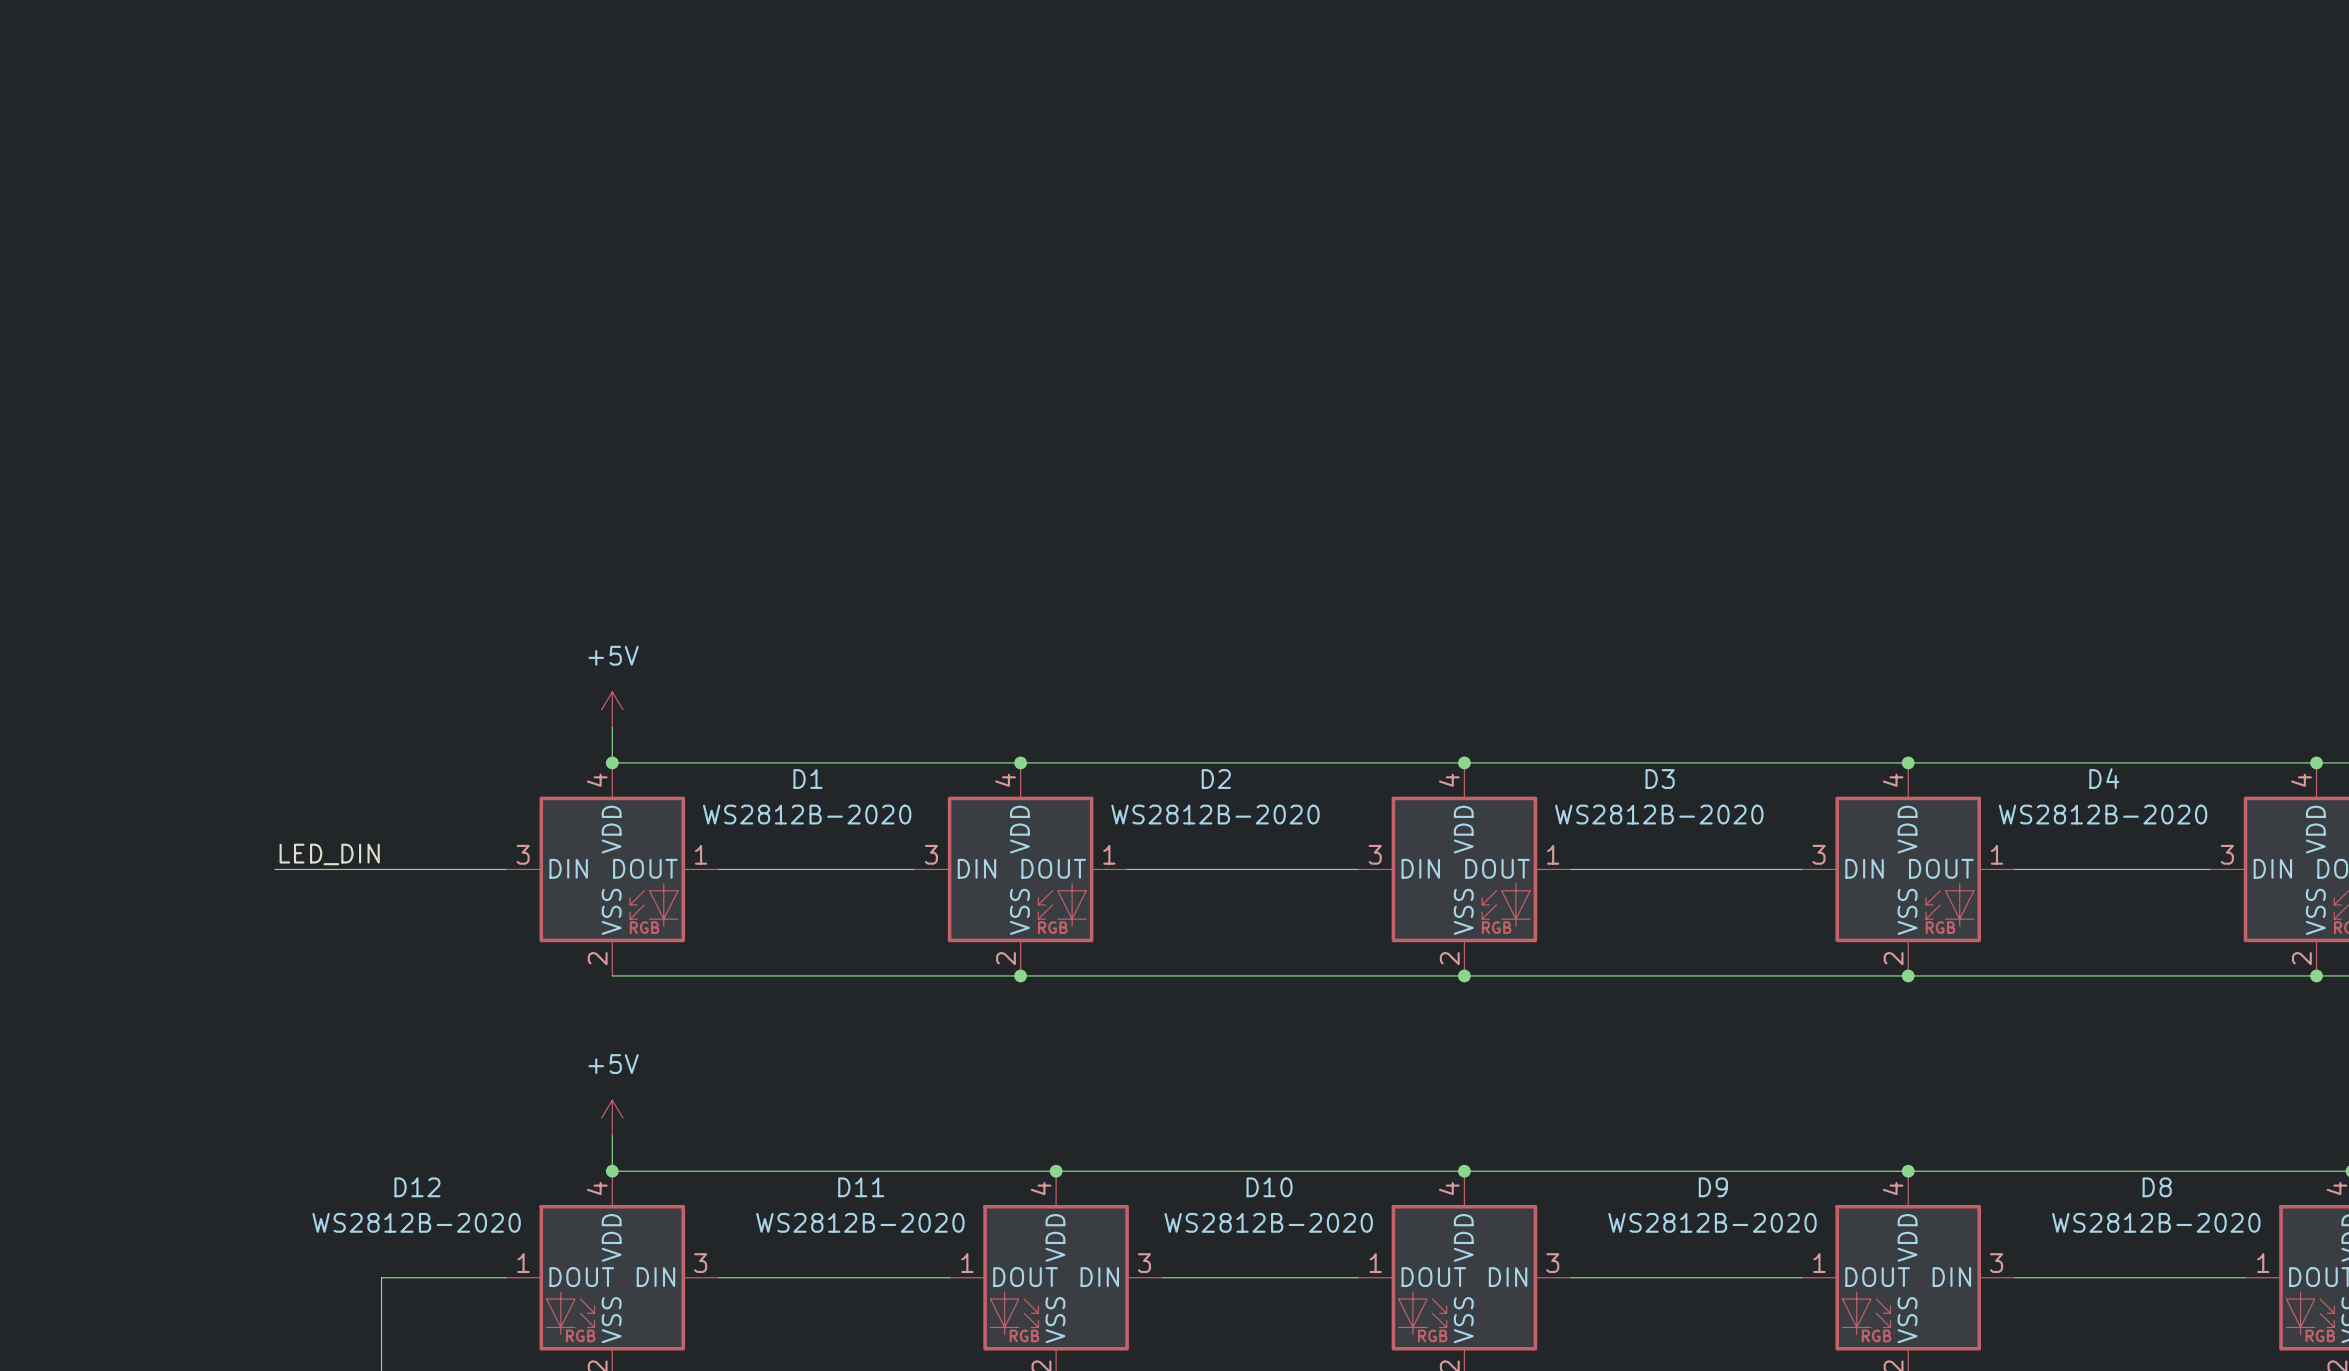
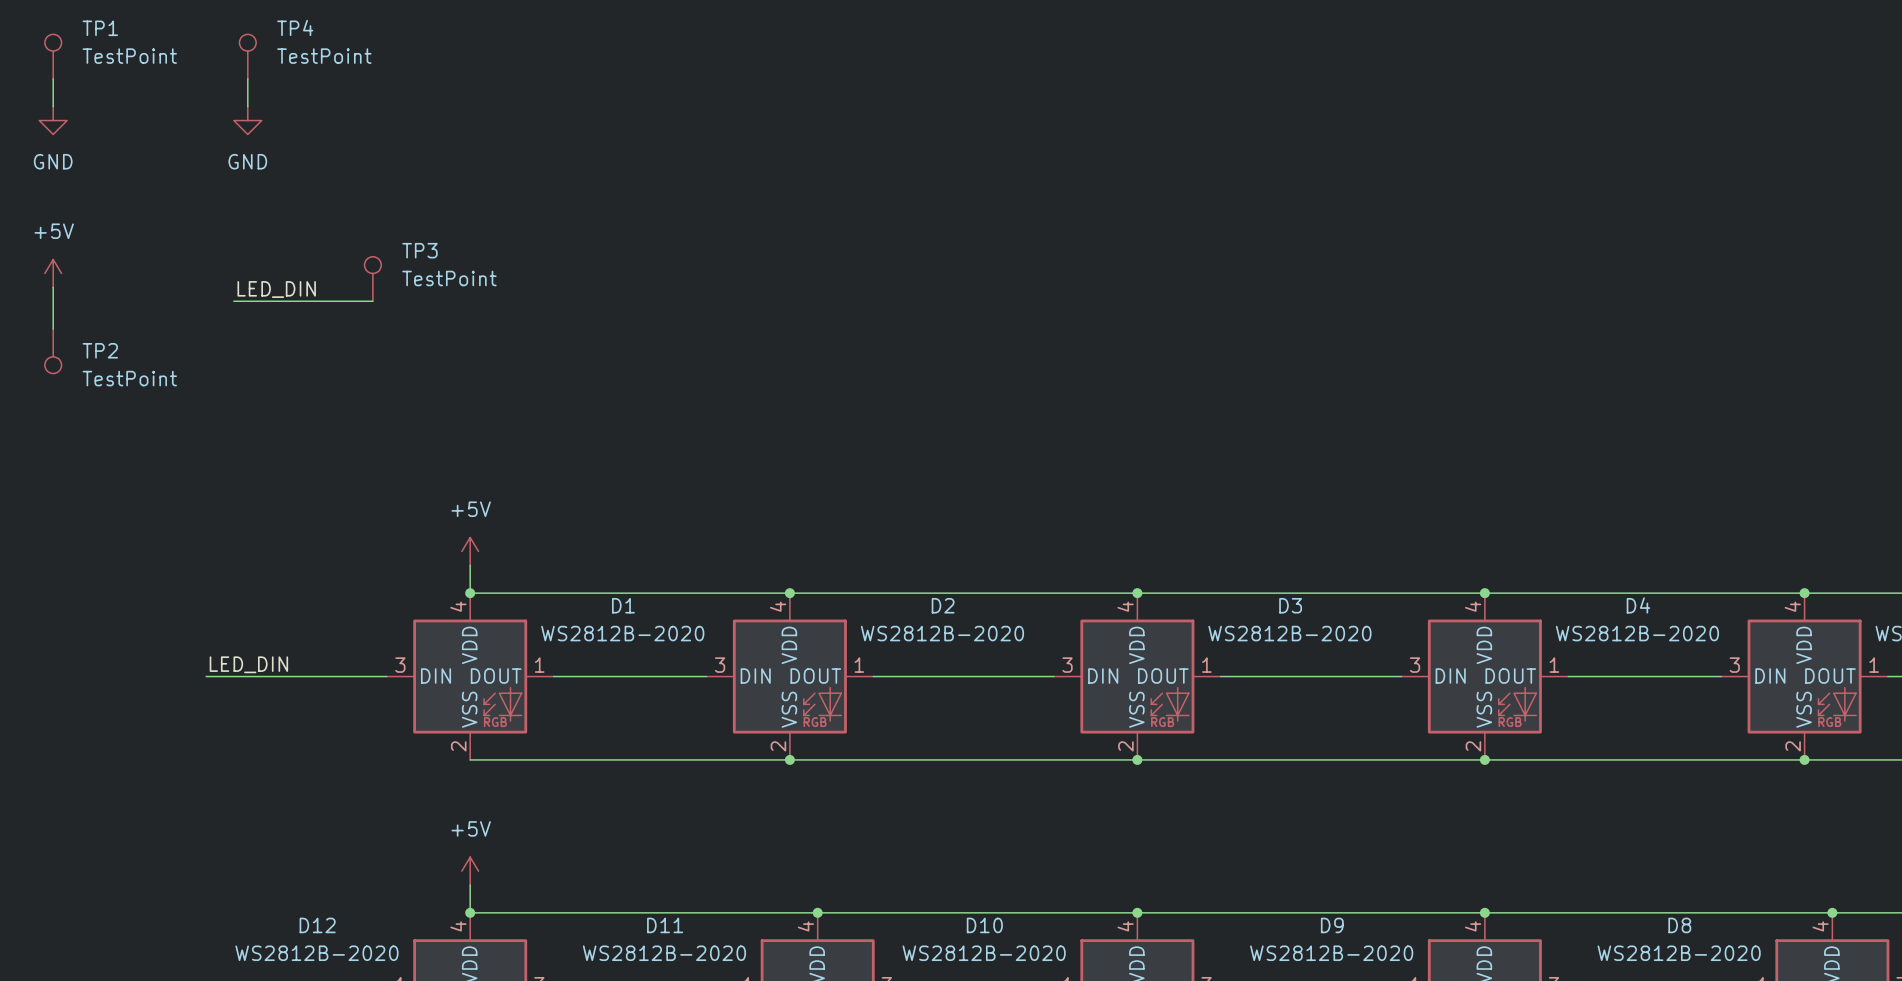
TP1: none -> TestPoint (53, 56)
TP4: none -> TestPoint (247, 56)
wire: none -> (53, 78) (53, 106)
wire: none -> (247, 78) (247, 106)
power symbol: none -> GND (53, 120)
power symbol: none -> GND (247, 120)
power symbol: none -> +5V (53, 273)
TP3: none -> TestPoint (372, 279)
wire: none -> (53, 287) (53, 329)
label: none -> LED_DIN (276, 289)
wire: none -> (233, 301) (372, 301)
TP2: none -> TestPoint (53, 351)

